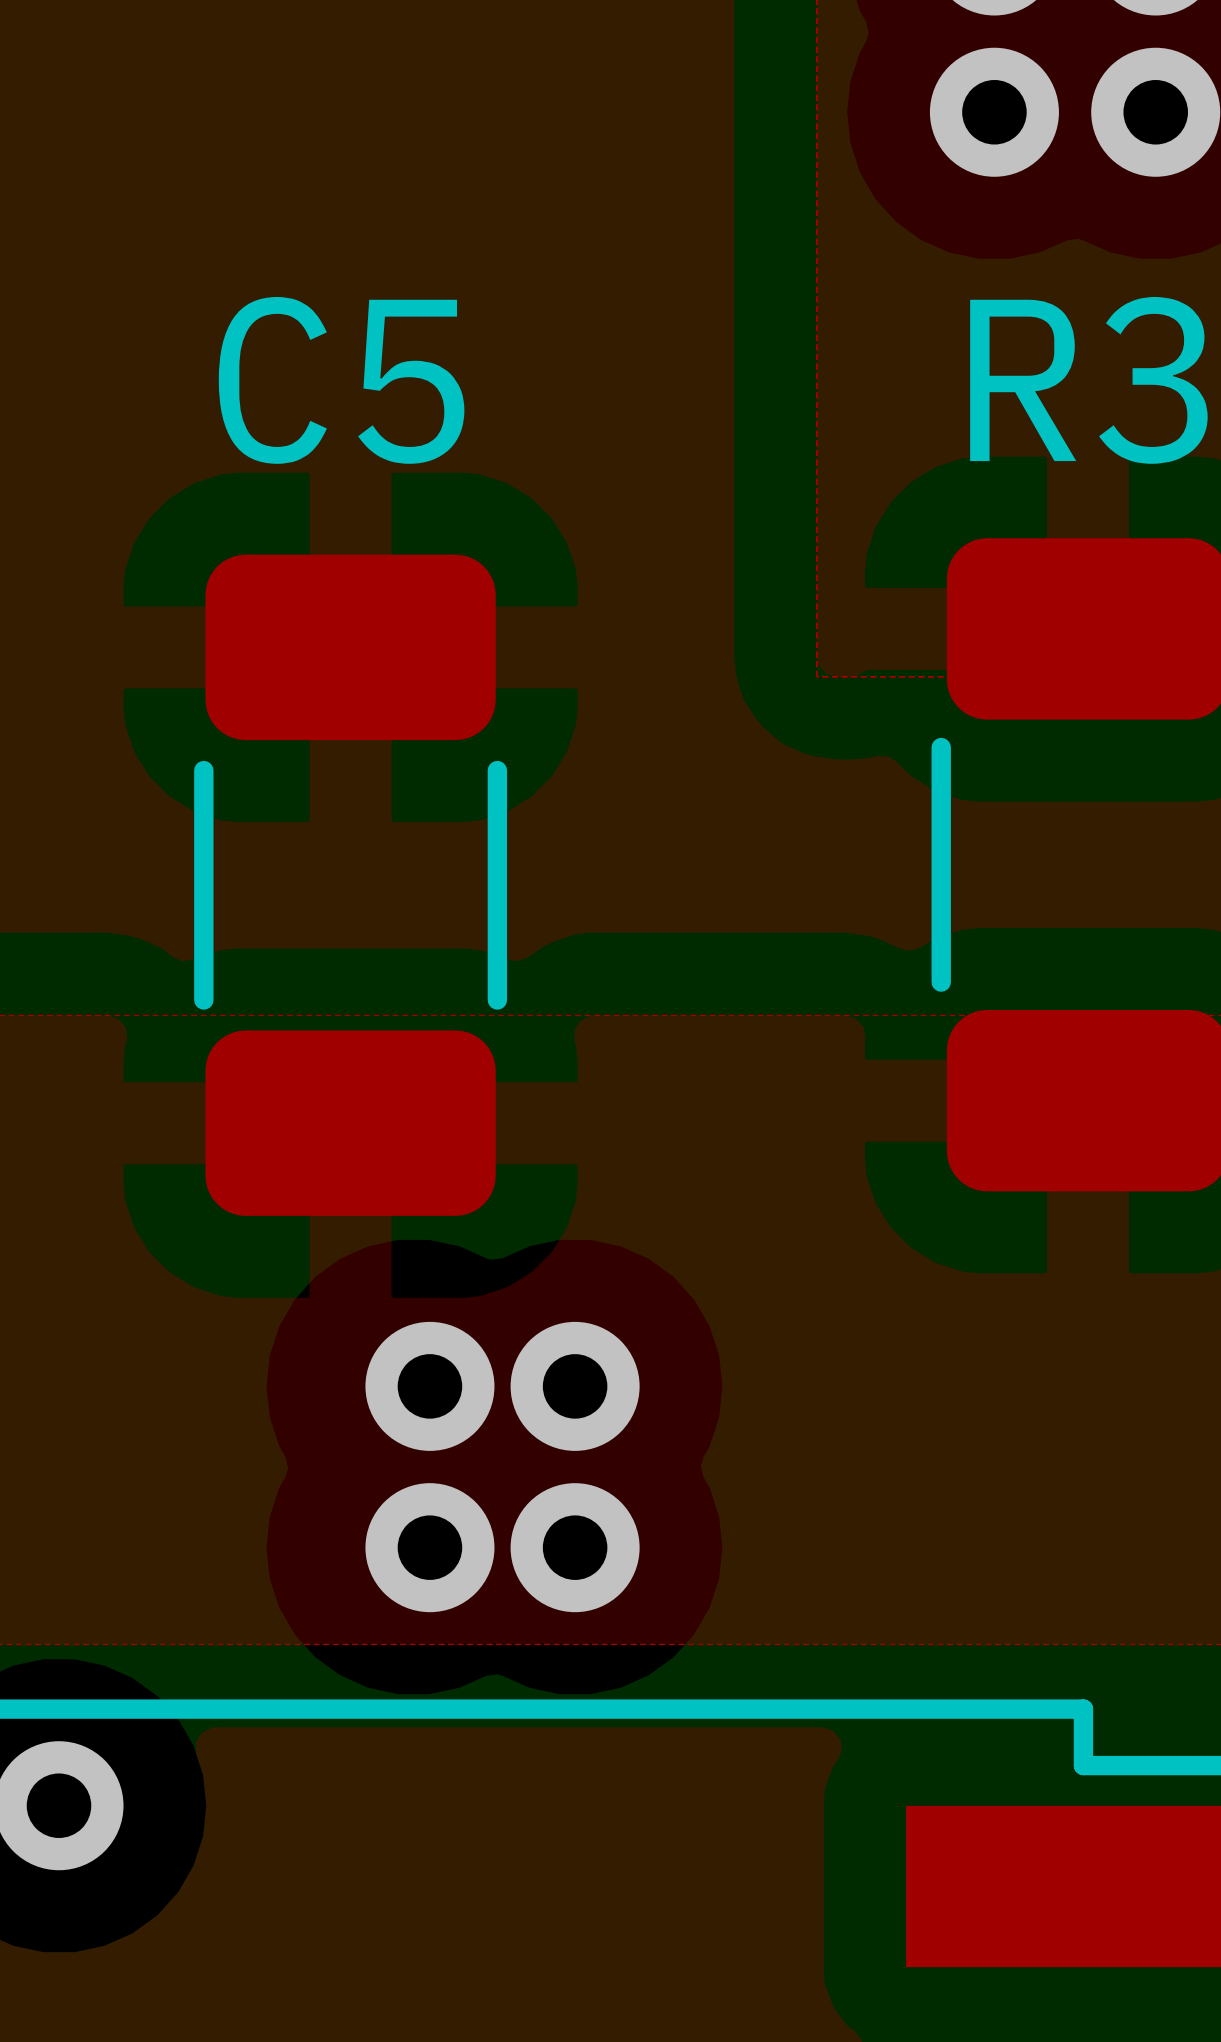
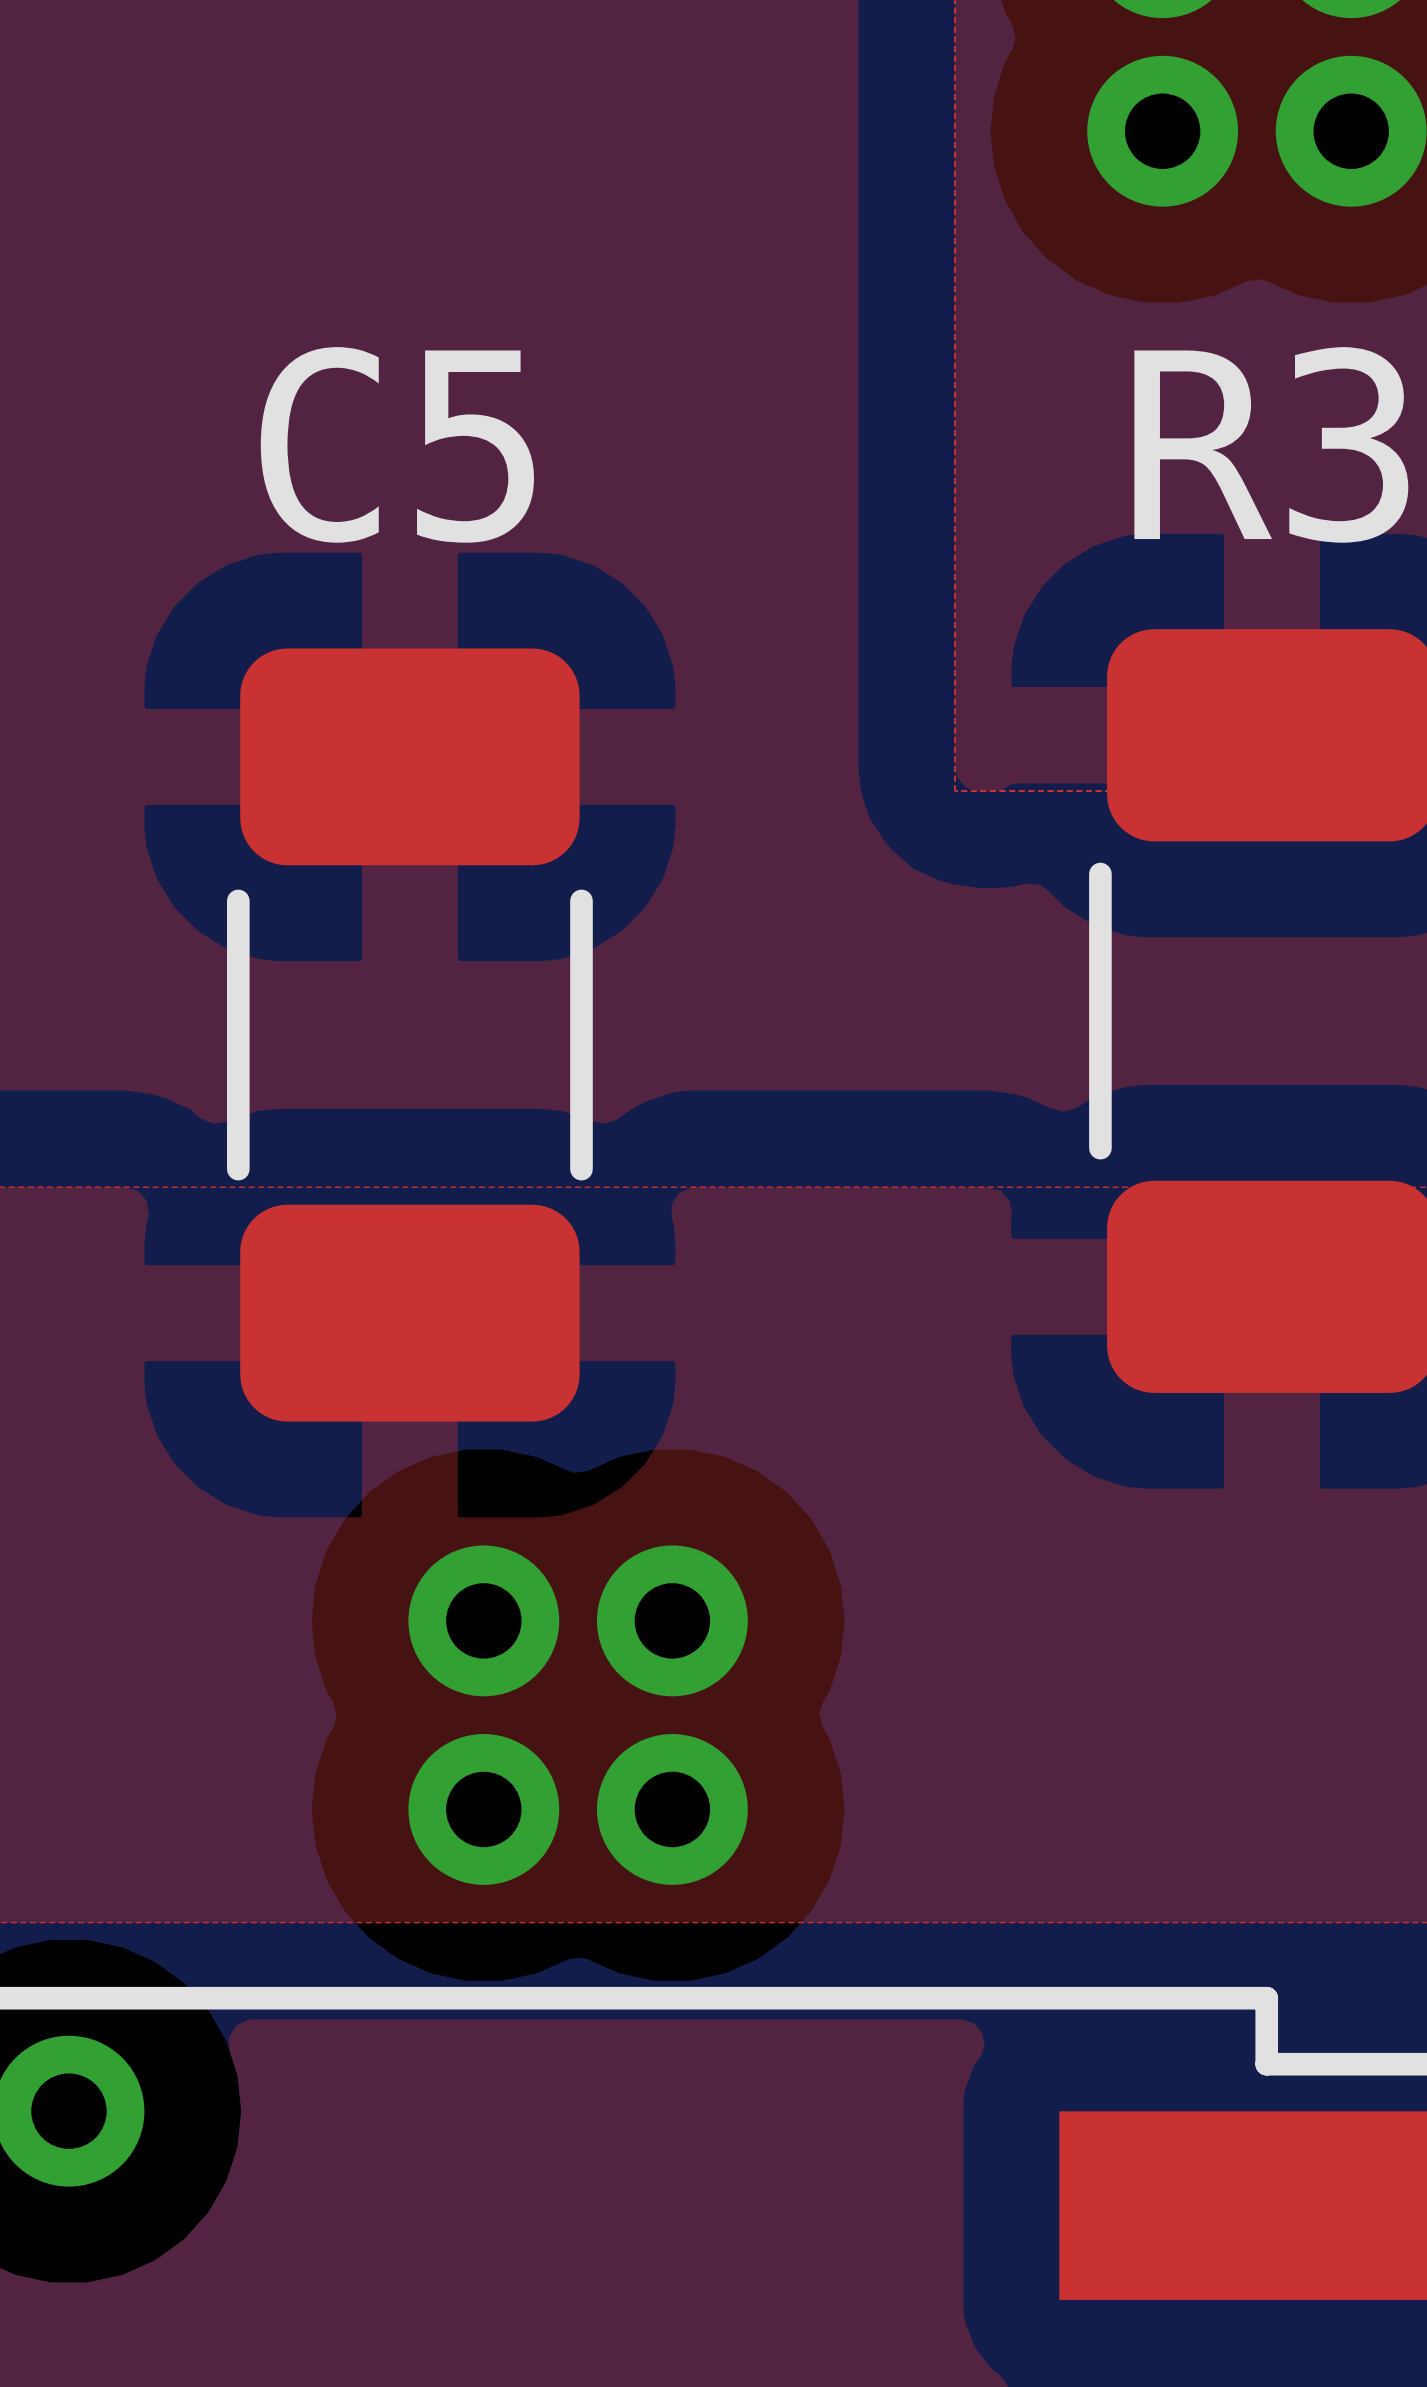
via position: (429, 1386) -> (483, 1620)
via position: (429, 1547) -> (483, 1809)

